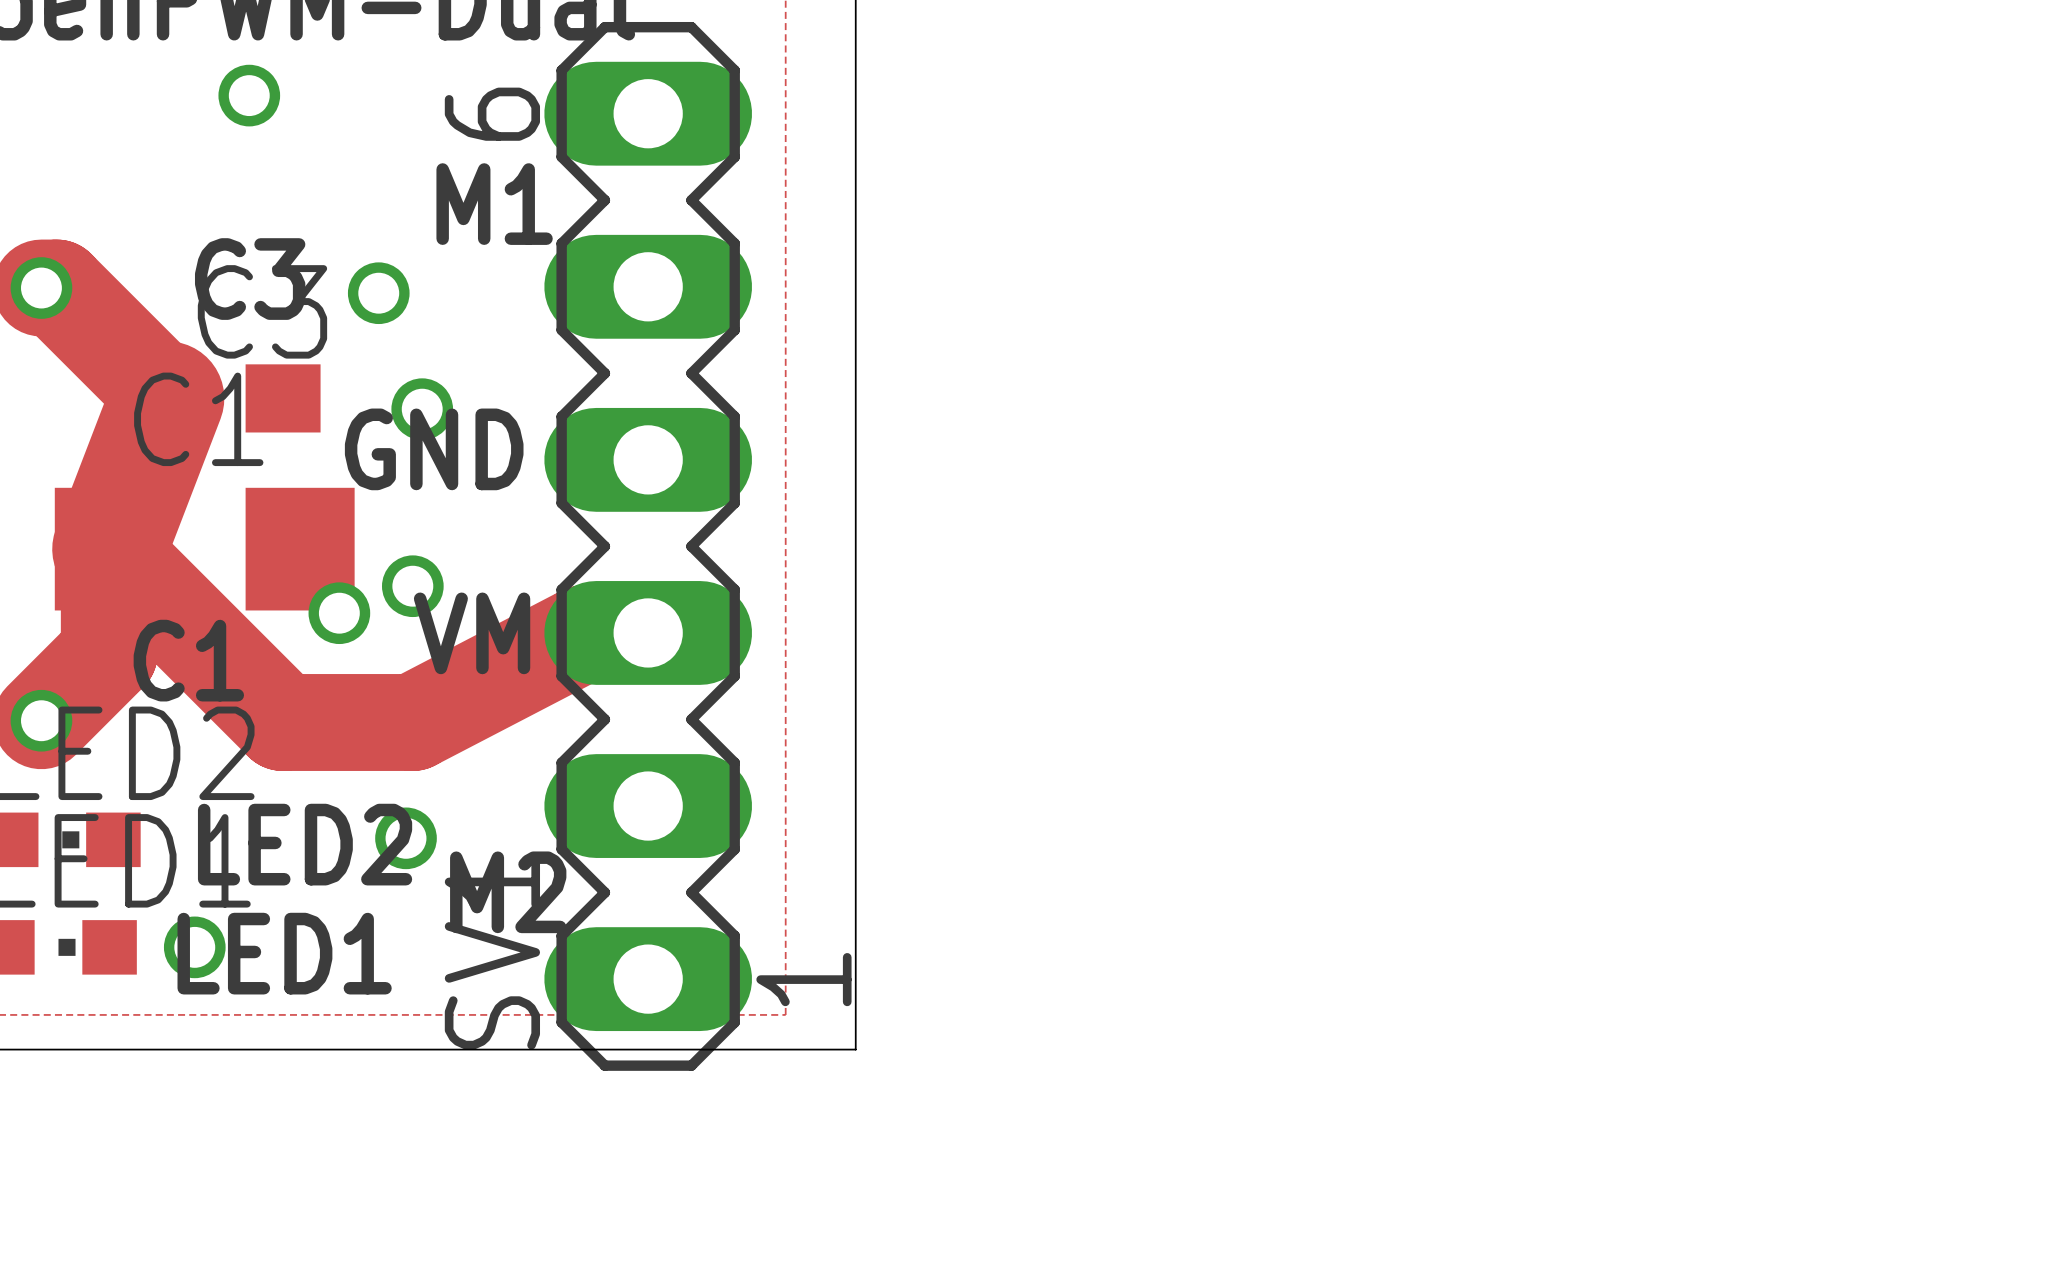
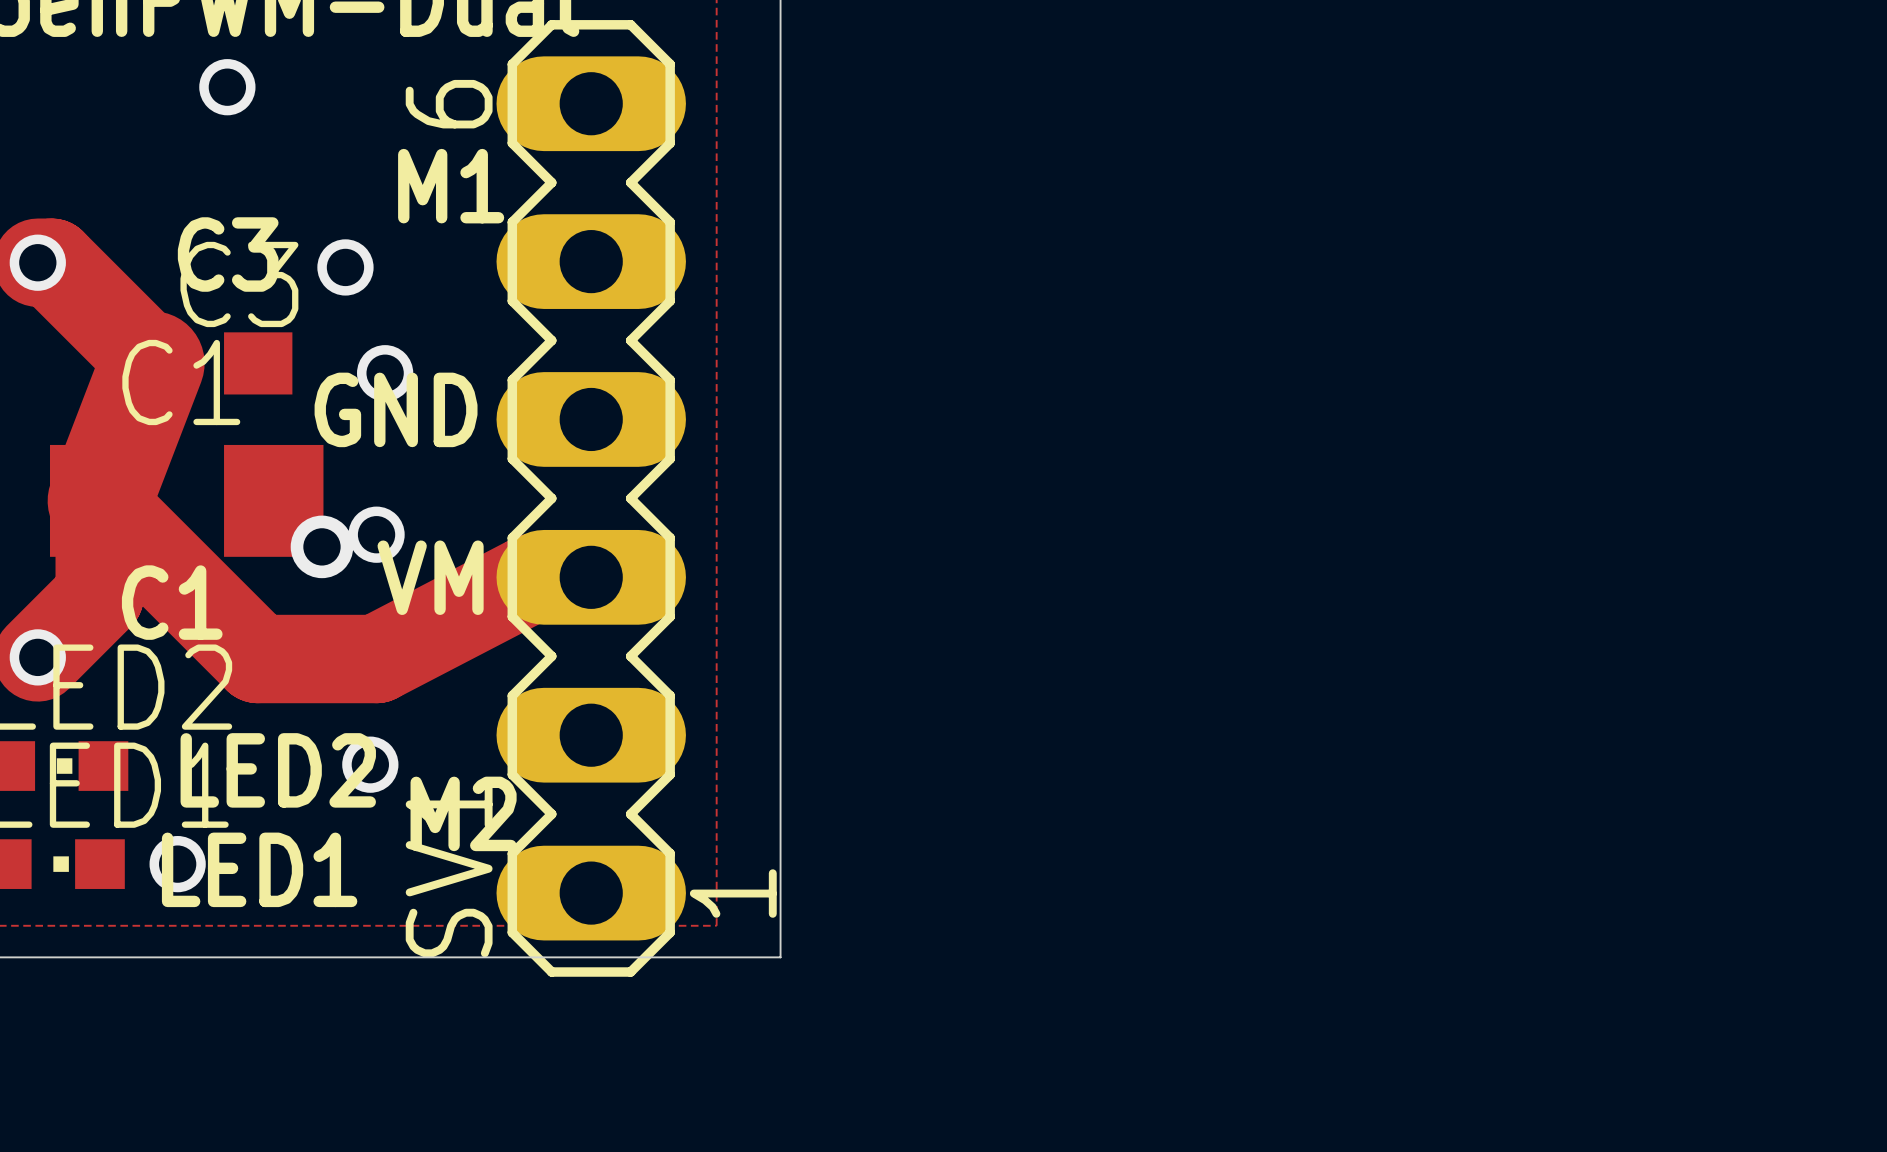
via position: (339, 613) -> (321, 546)

